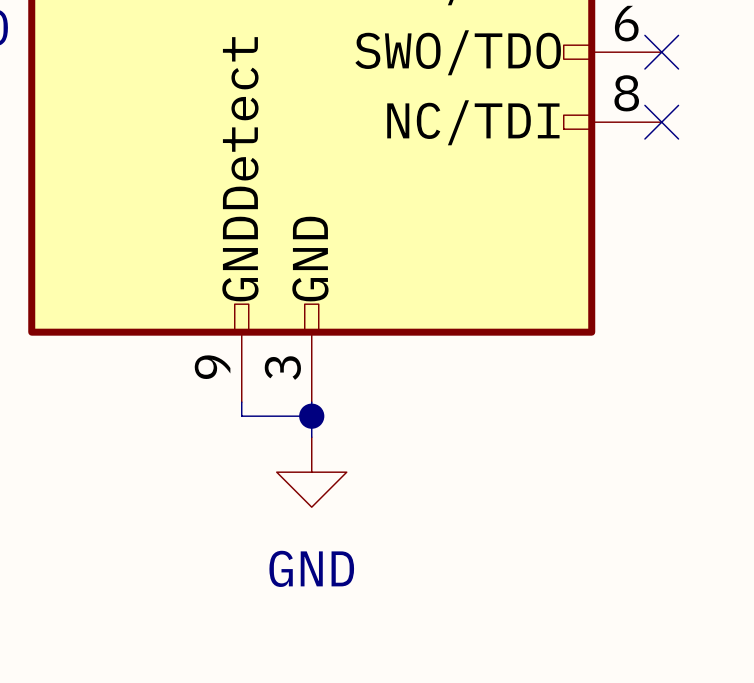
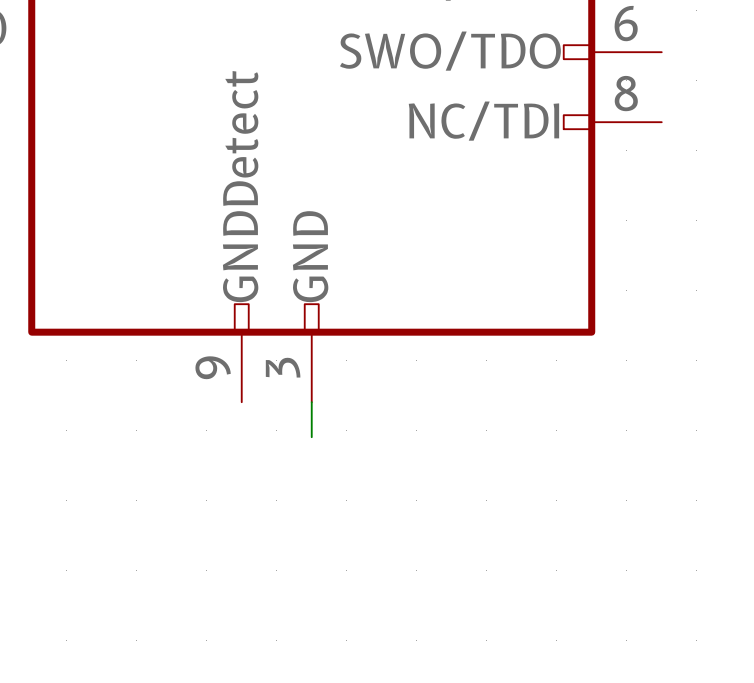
no-connect mark: (661, 52) -> none
no-connect mark: (661, 122) -> none
wire: (241, 402) (241, 416) (311, 416) -> none
junction: (311, 416) -> none
power symbol: GND (311, 472) -> none

